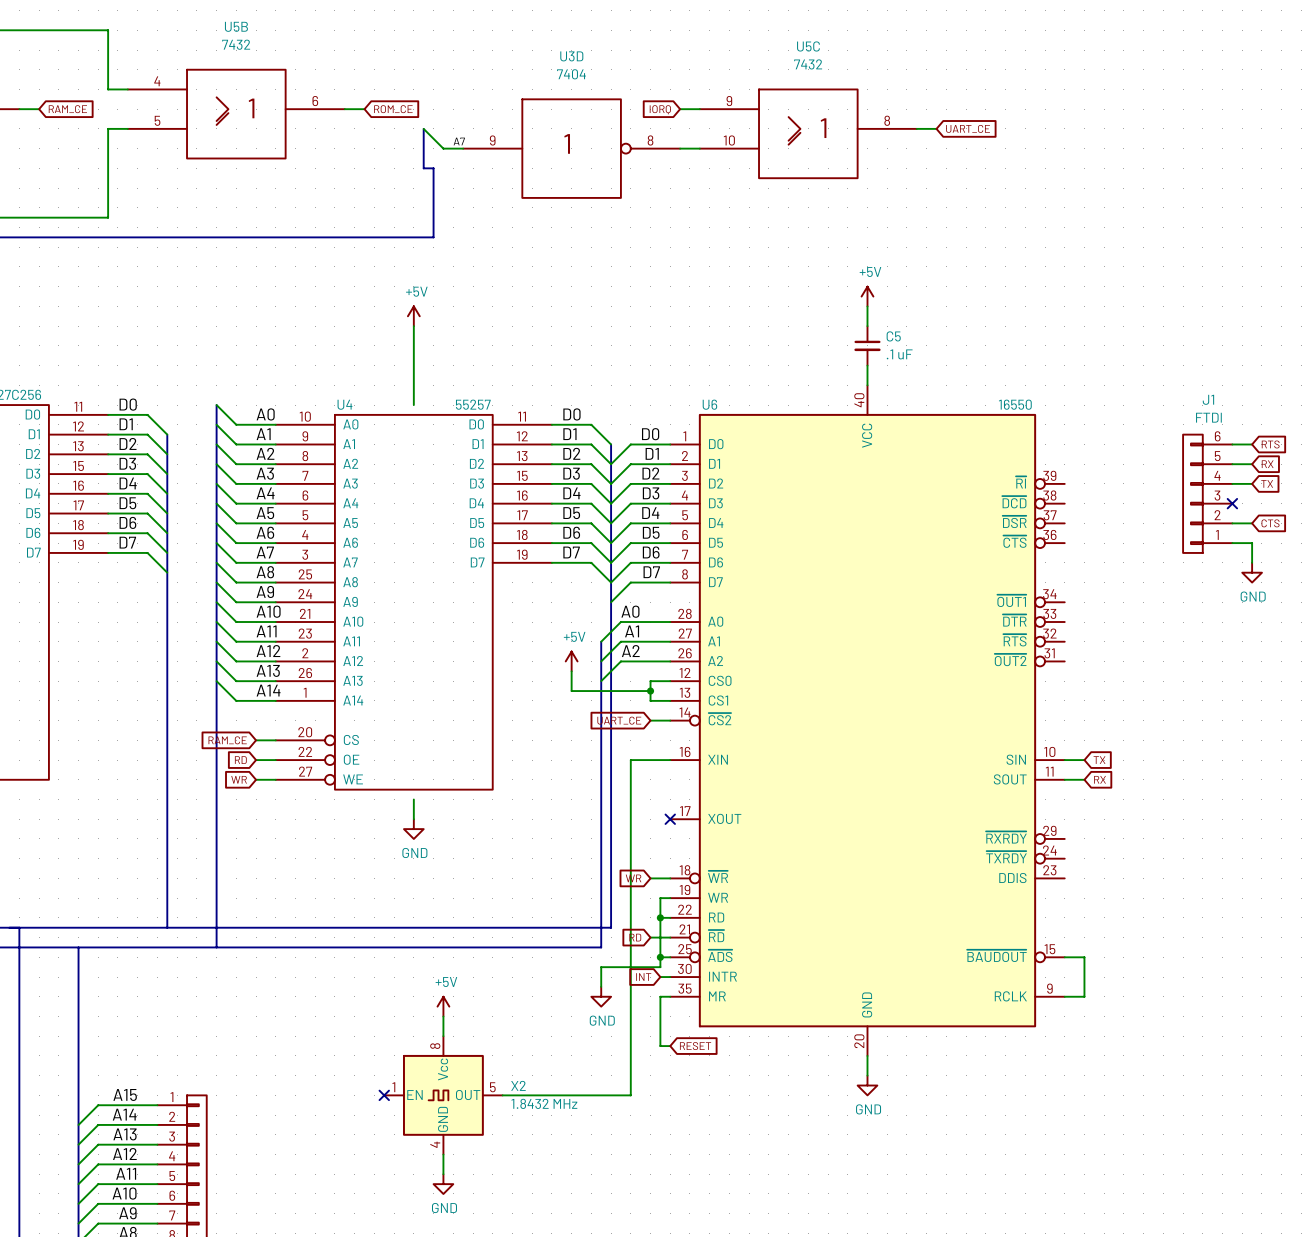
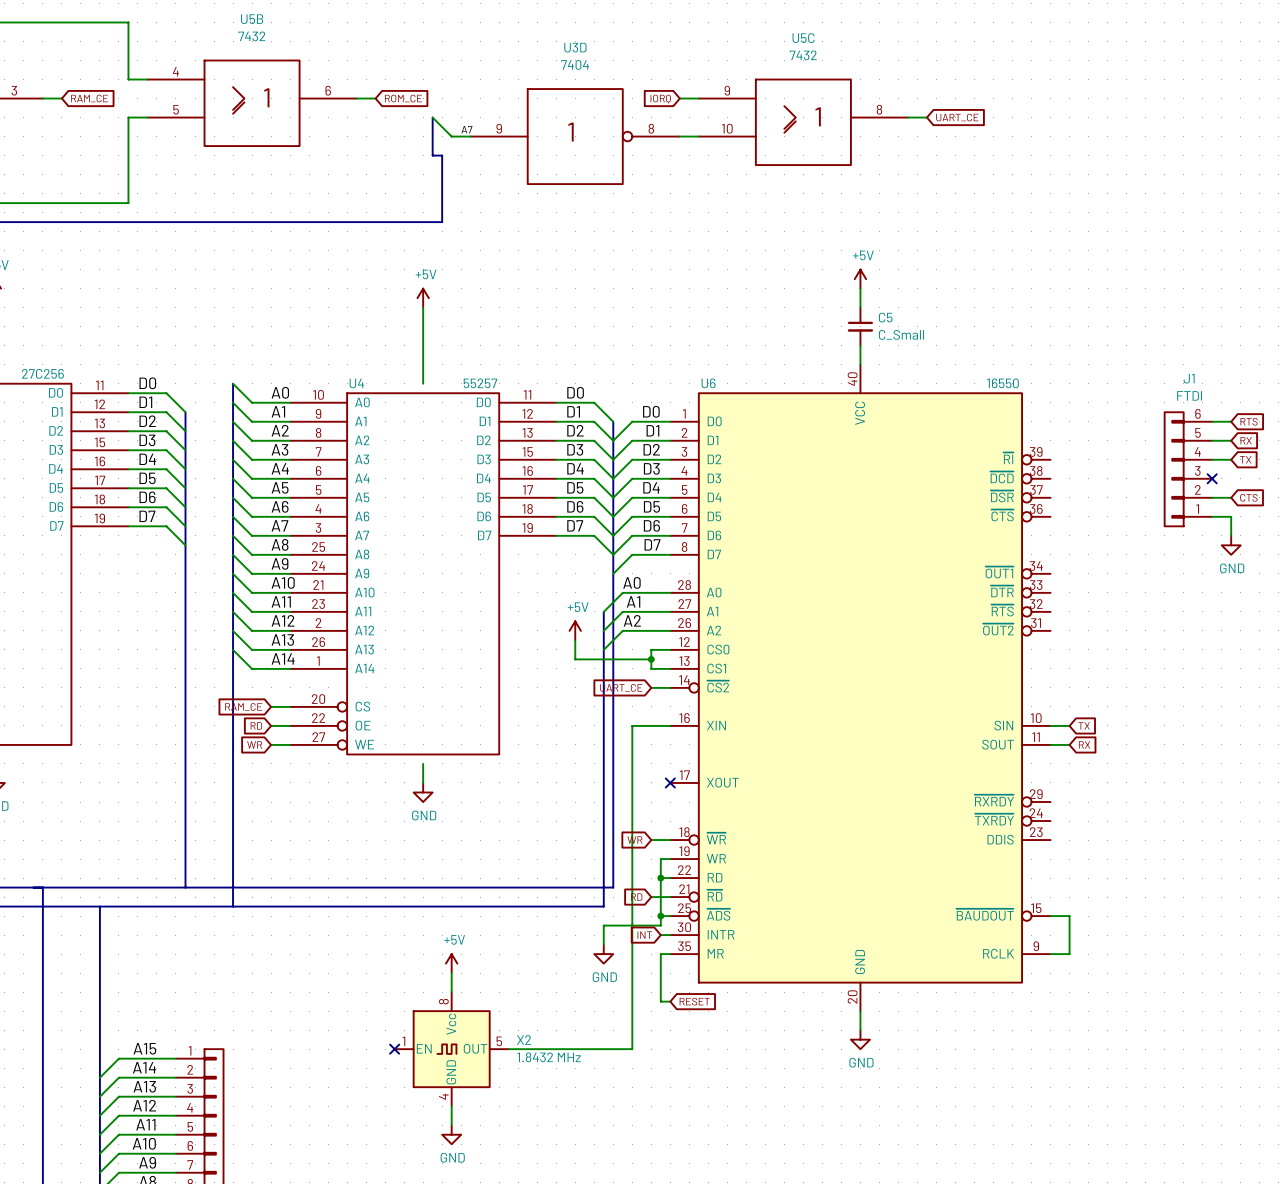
C5 value: .1 uF (899, 354) -> C_Small (901, 334)

